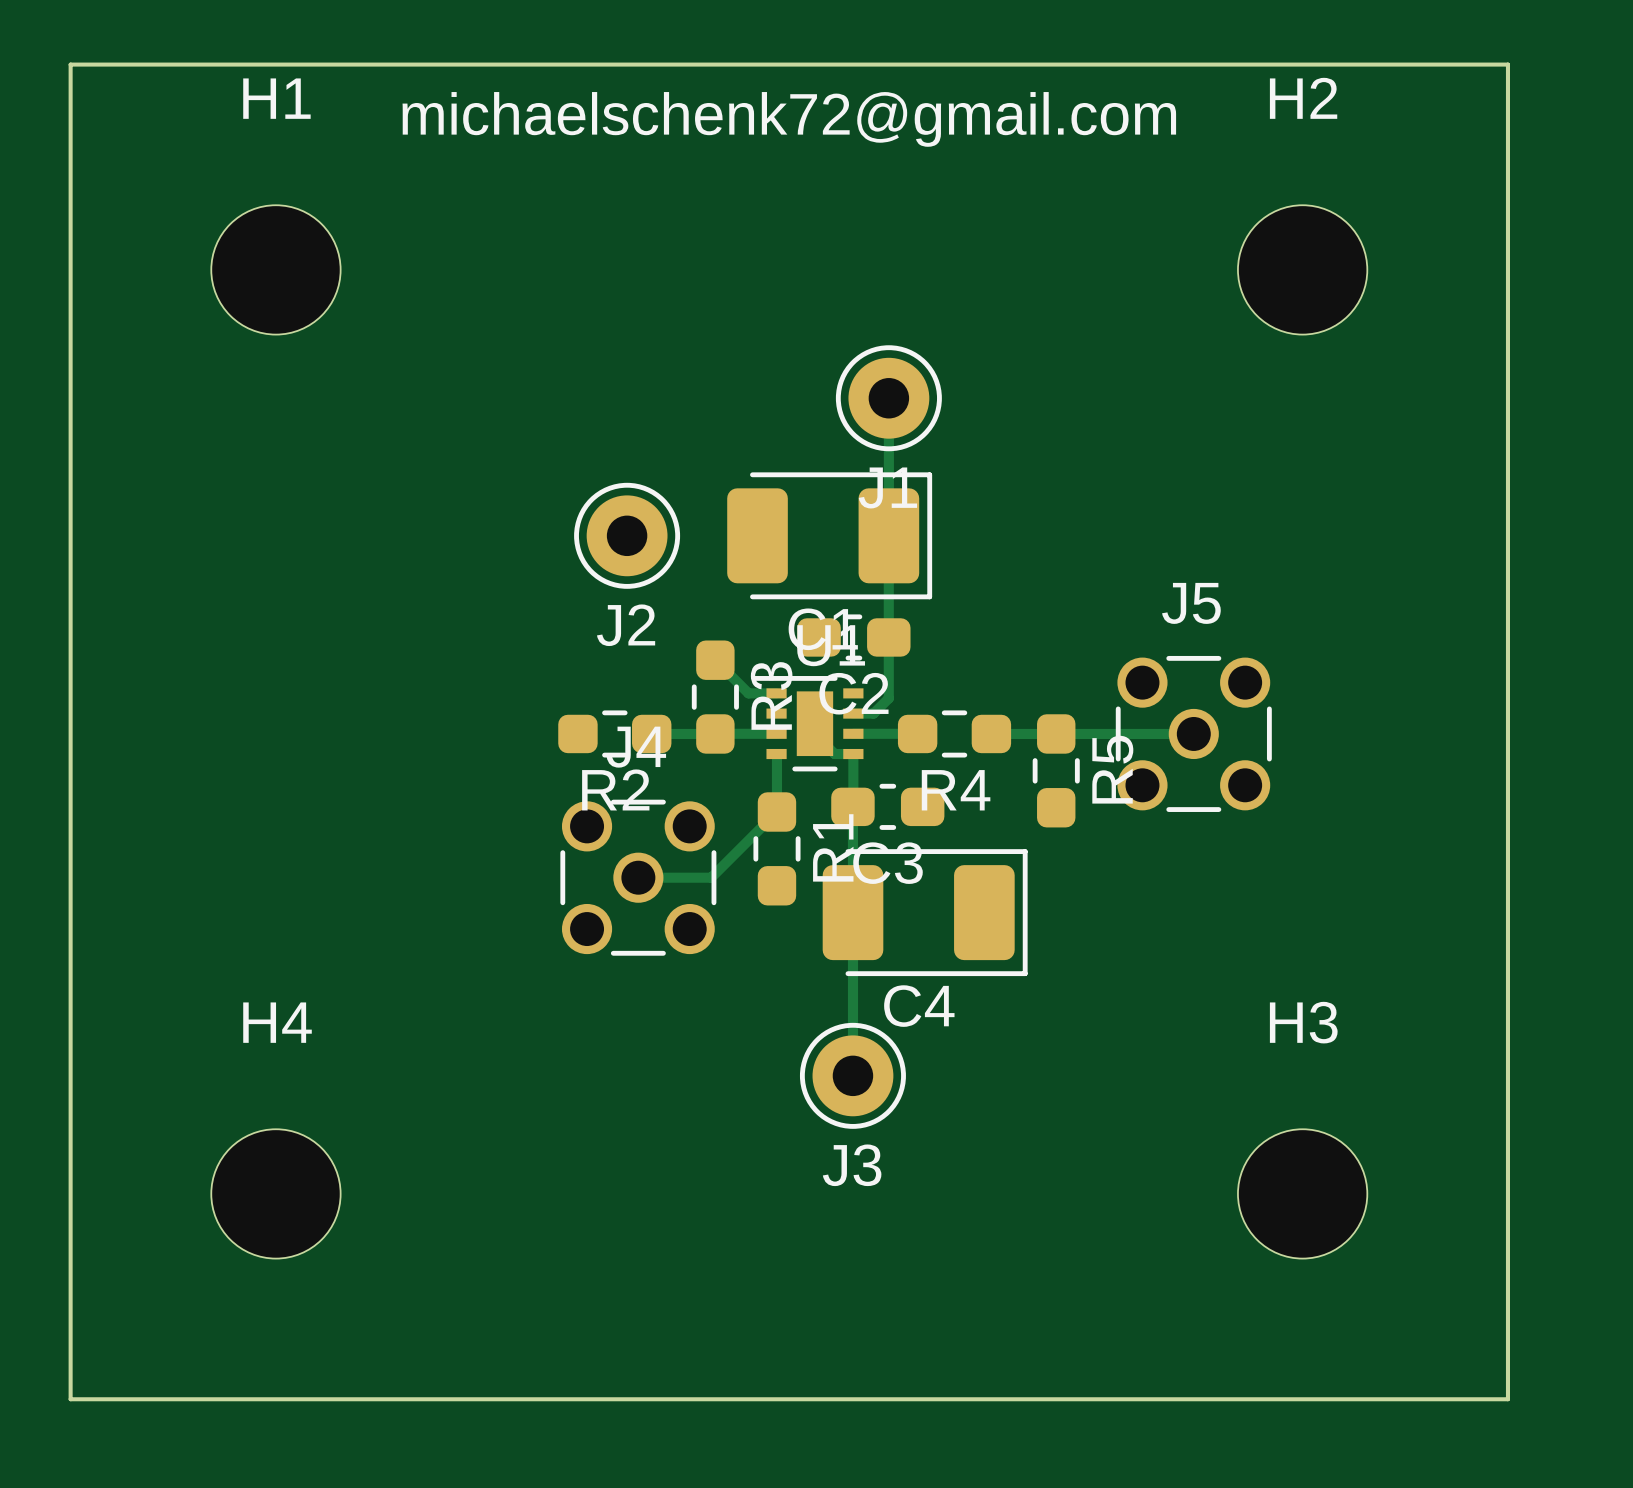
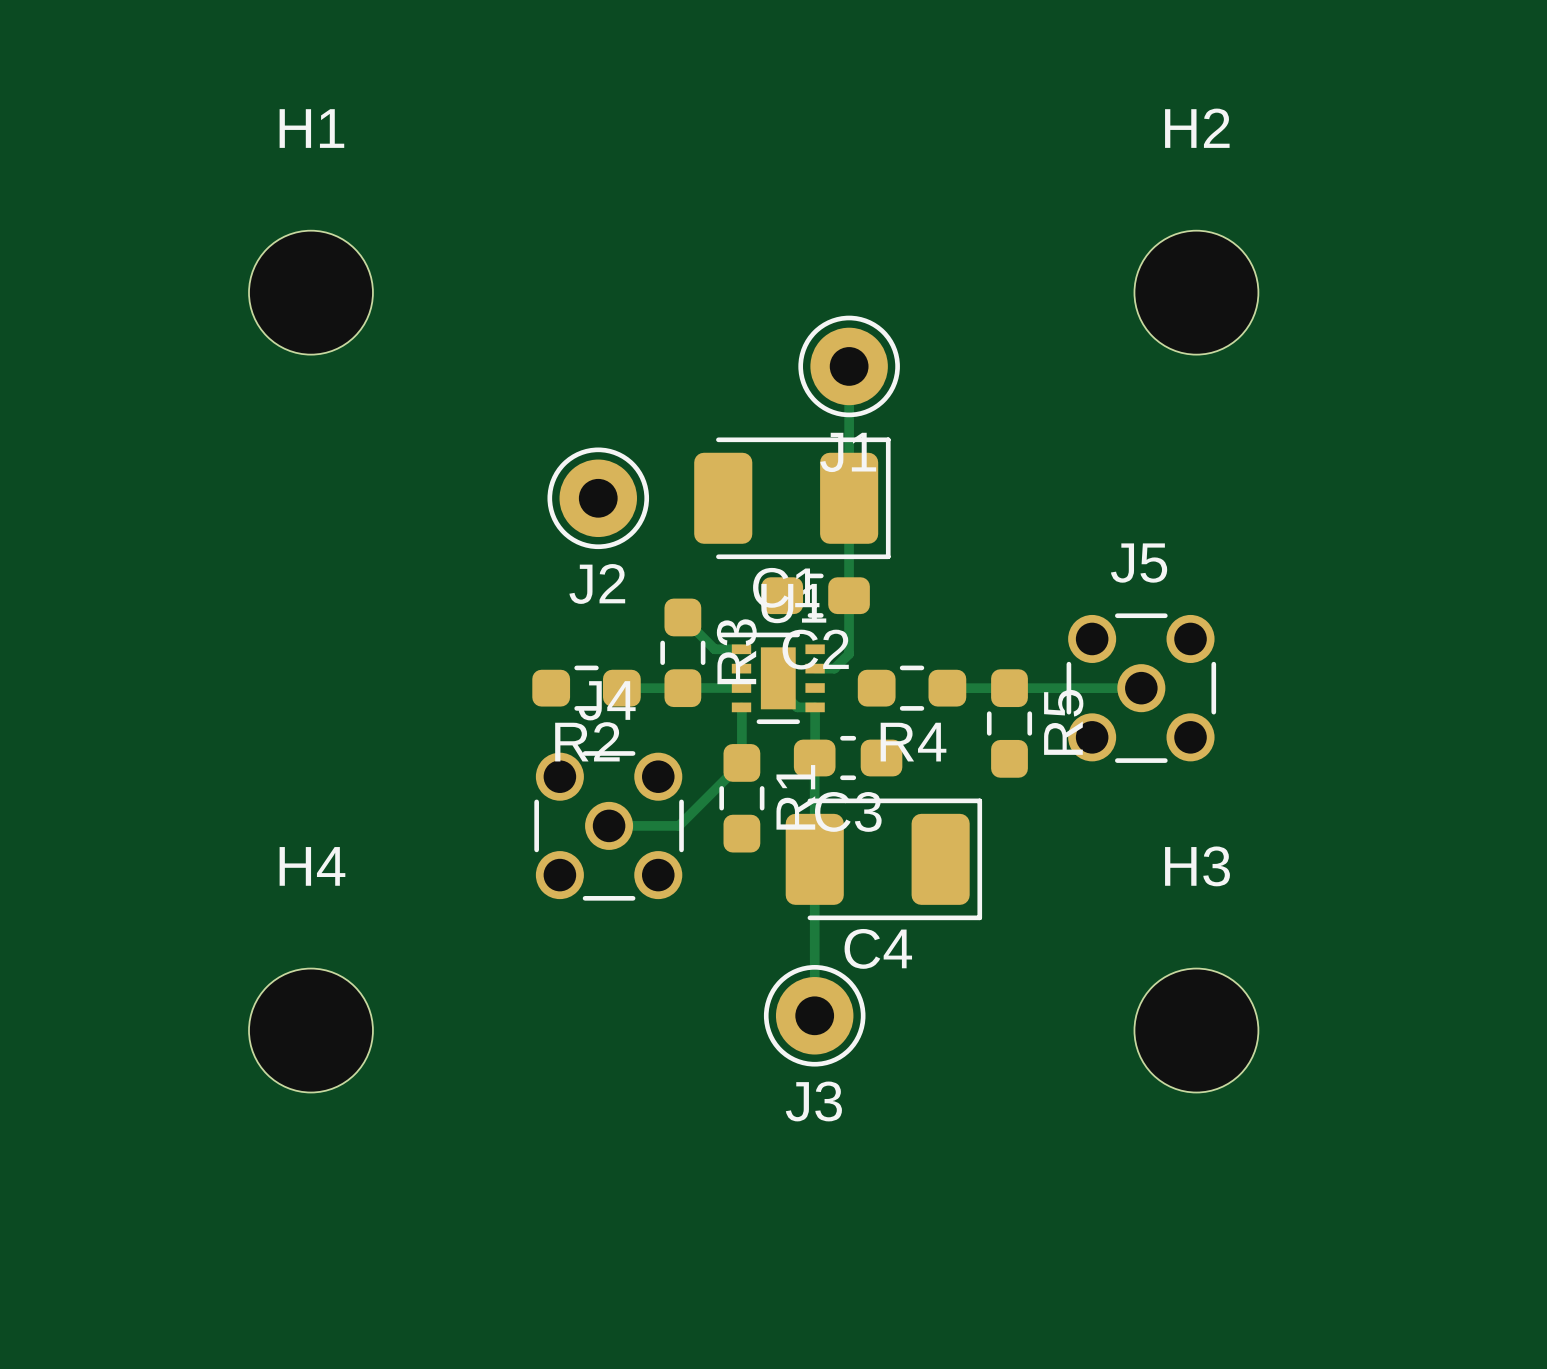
board edge: (70, 64) (1507, 64) (1507, 1399) (70, 1399) (70, 64) -> none
text: michaelschenk72@gmail.com (789, 119) -> none
H1 position: (275, 269) -> (310, 292)
H2 position: (1302, 269) -> (1196, 292)
track: (853, 733) (917, 733) -> none
H4 position: (275, 1193) -> (310, 1030)
H3 position: (1302, 1193) -> (1196, 1030)

